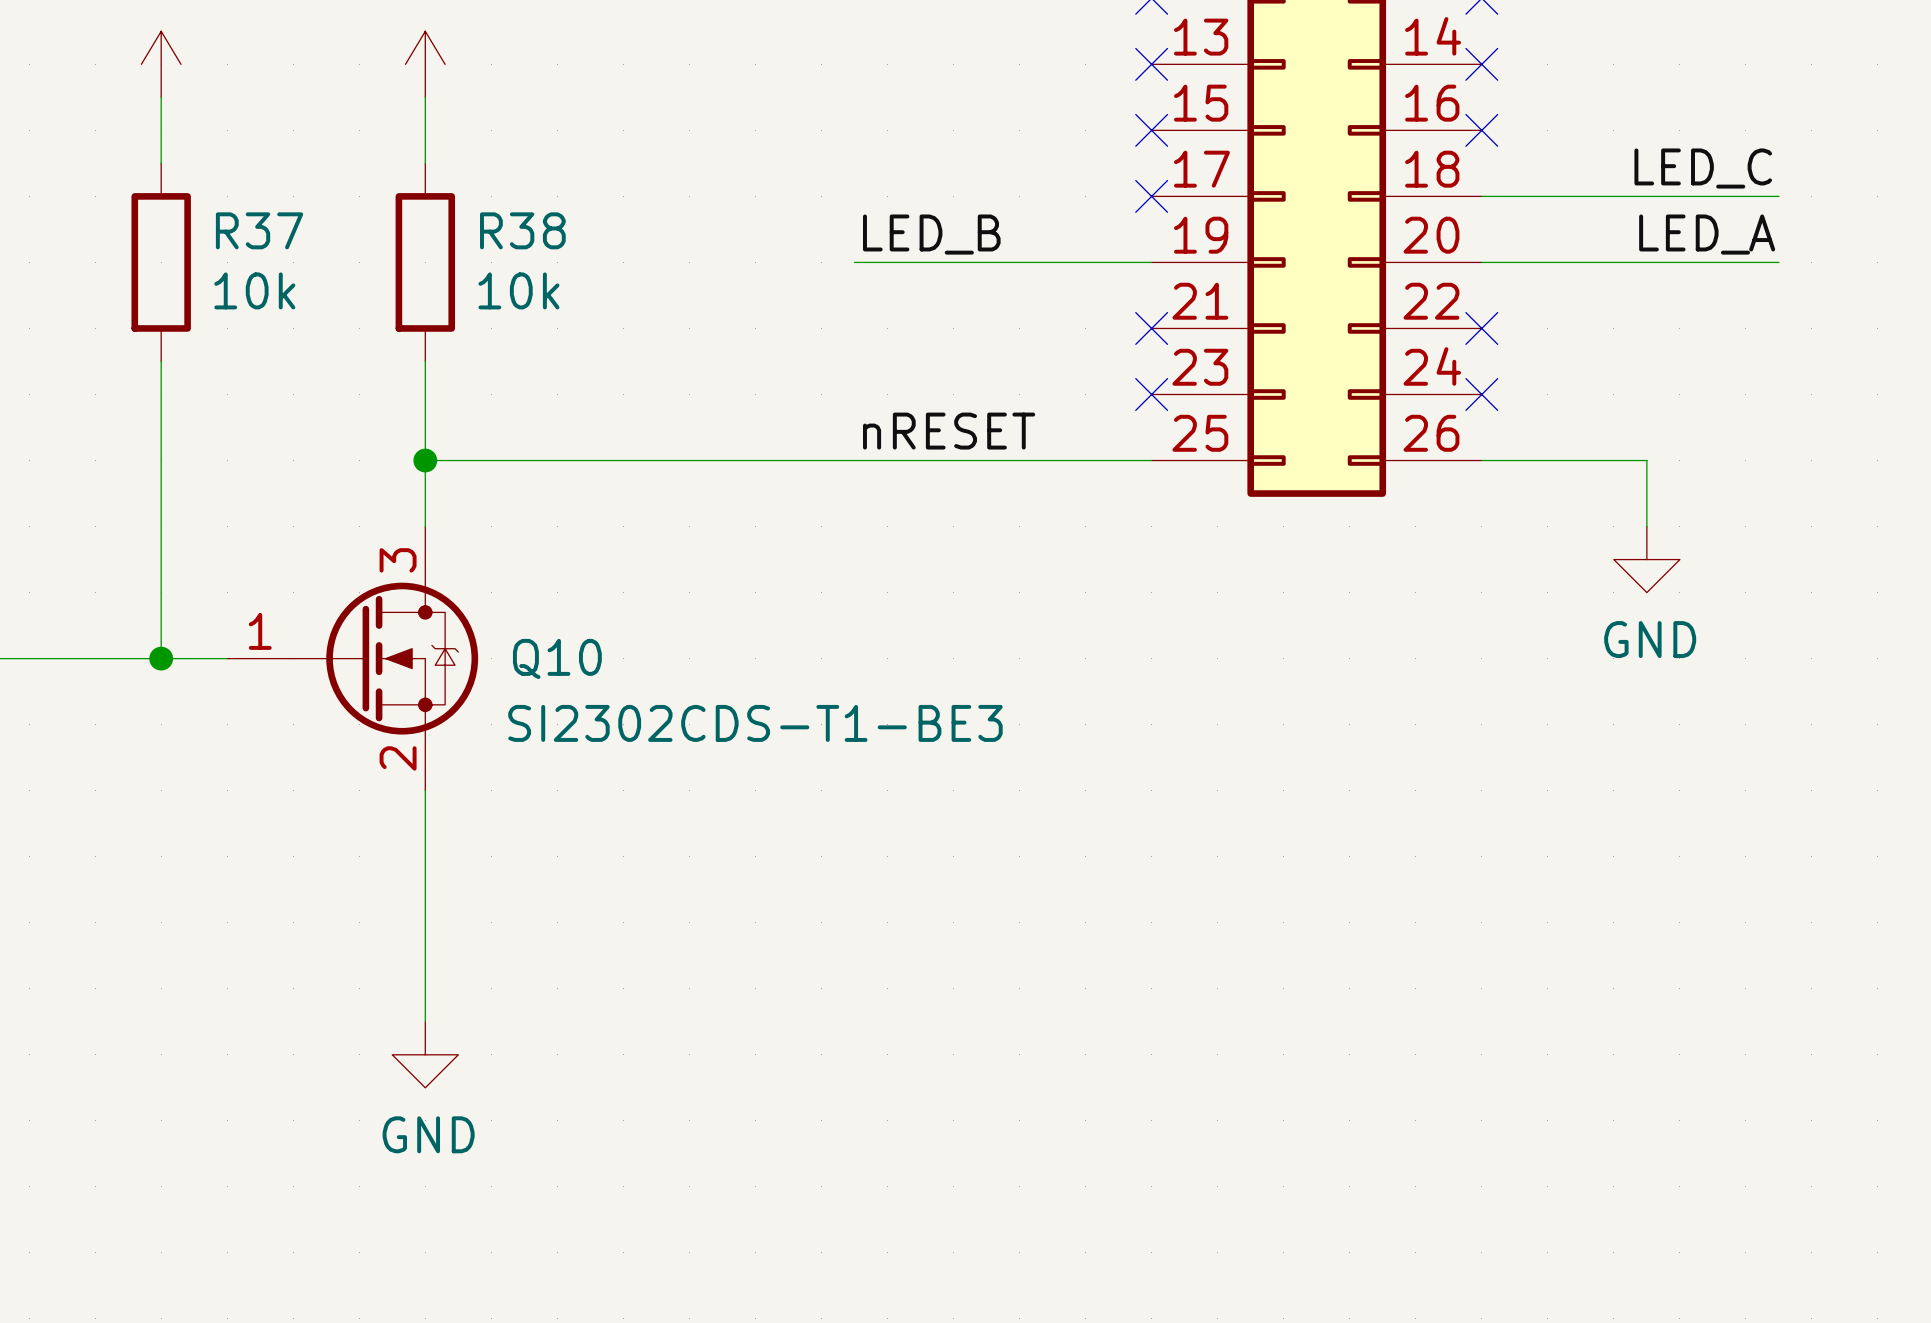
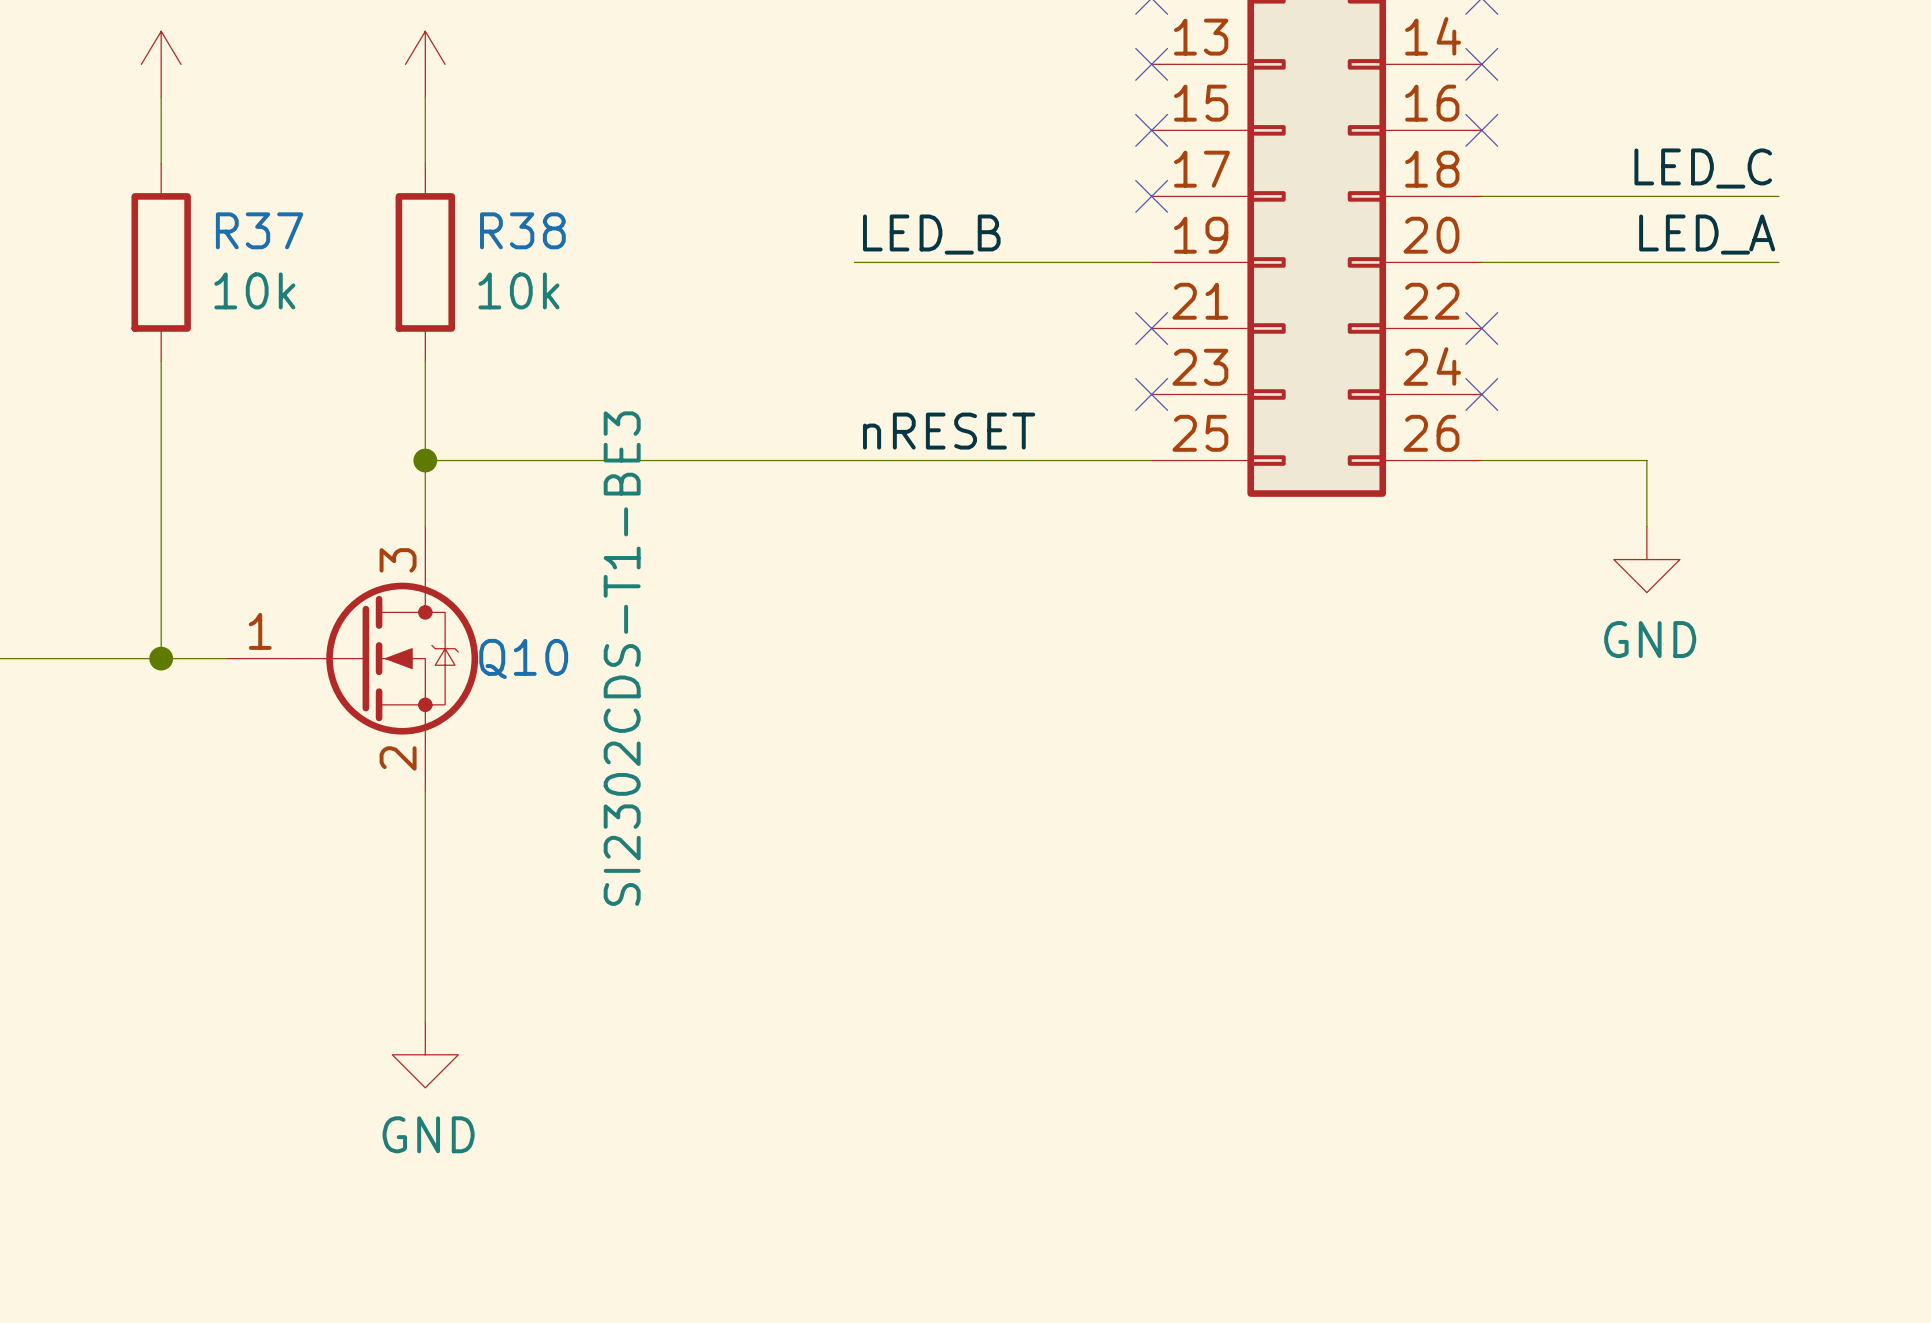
Q10 name position: Q10 (557, 658) -> Q10 (523, 658)
Q10 value rotation: 0° (755, 723) -> 90° counterclockwise (622, 658)

